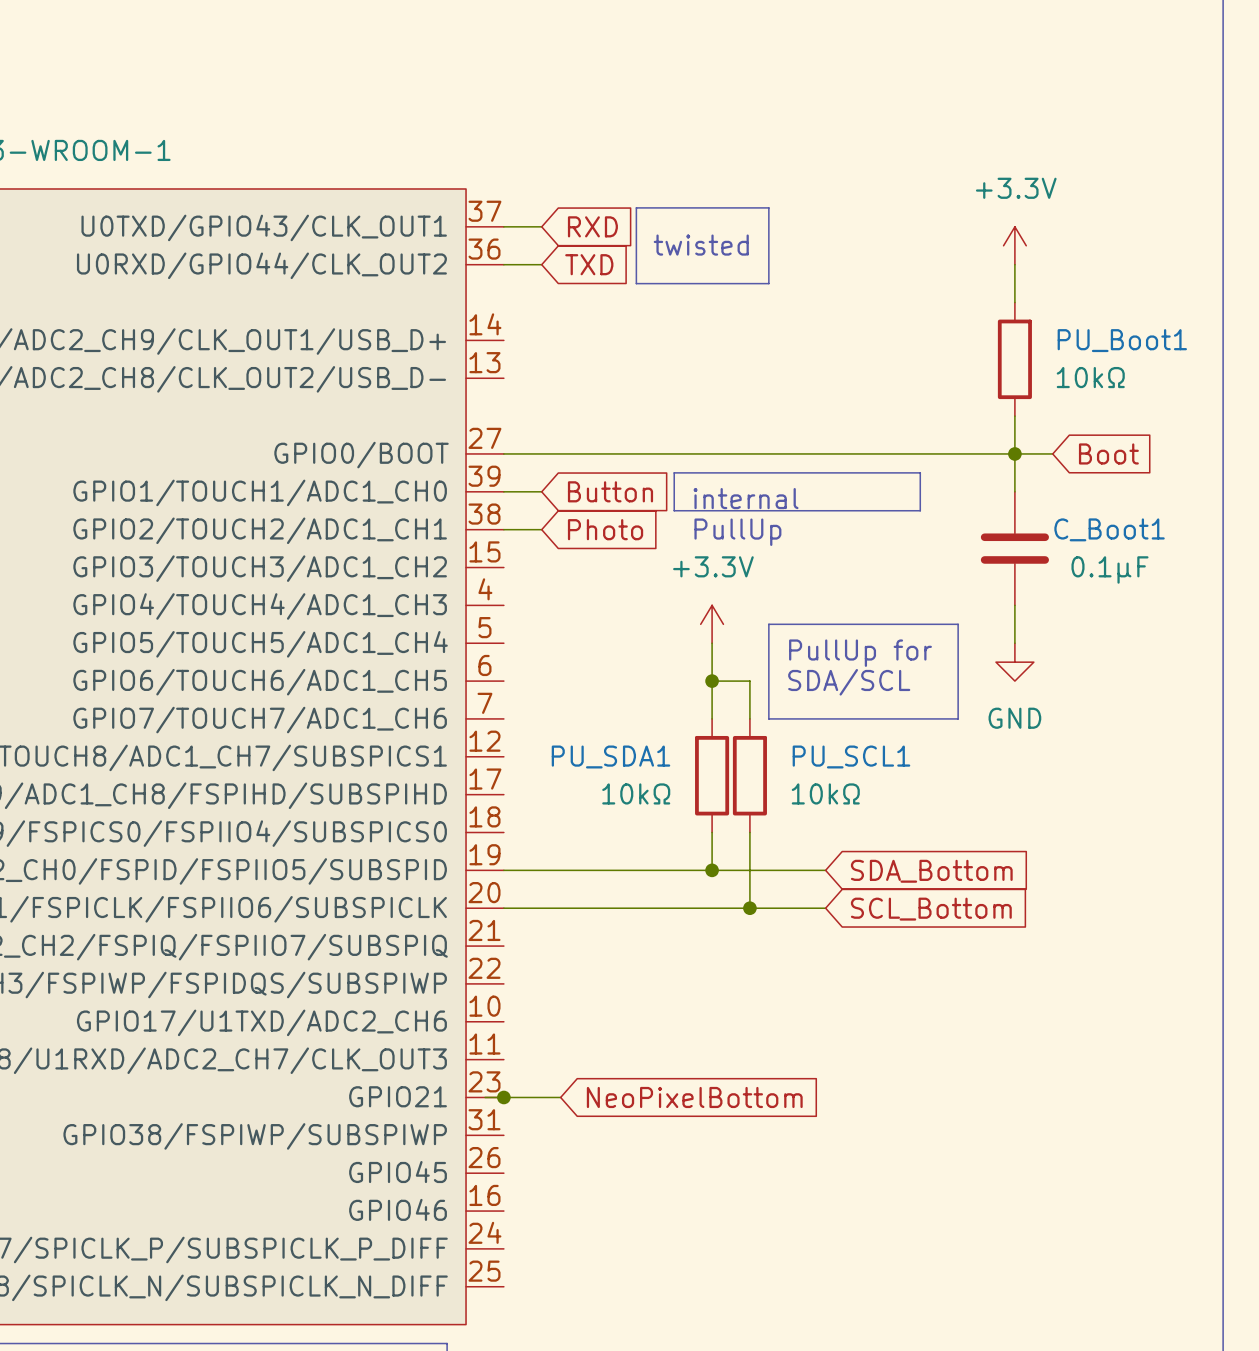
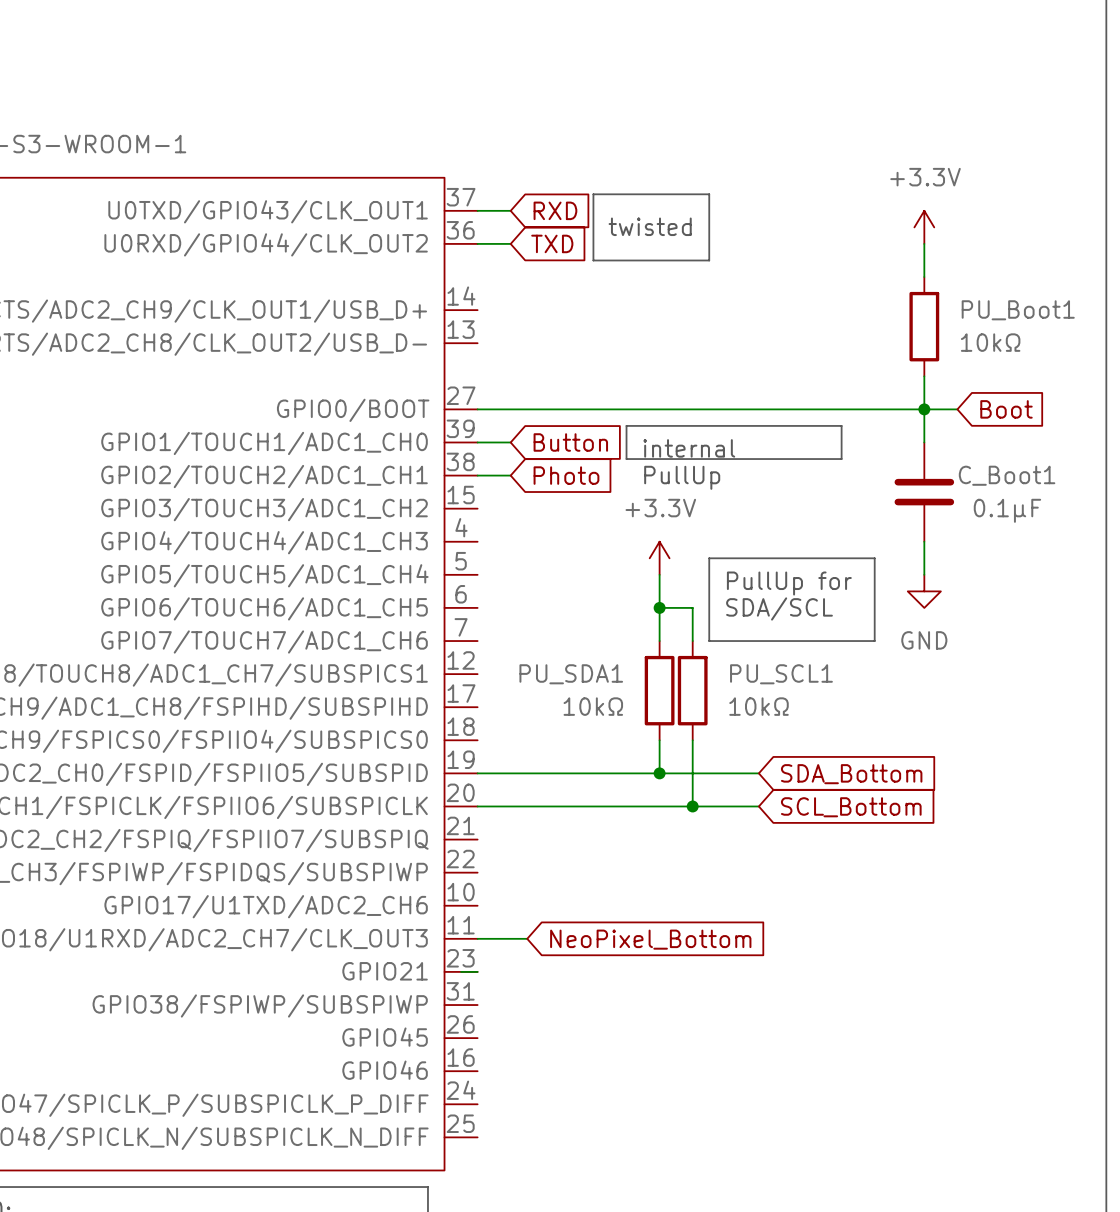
wire: (503, 1097) (560, 1097) -> (477, 938) (527, 938)
junction: (503, 1097) -> none
global label: NeoPixelBottom (694, 1097) -> NeoPixel_Bottom (650, 939)

